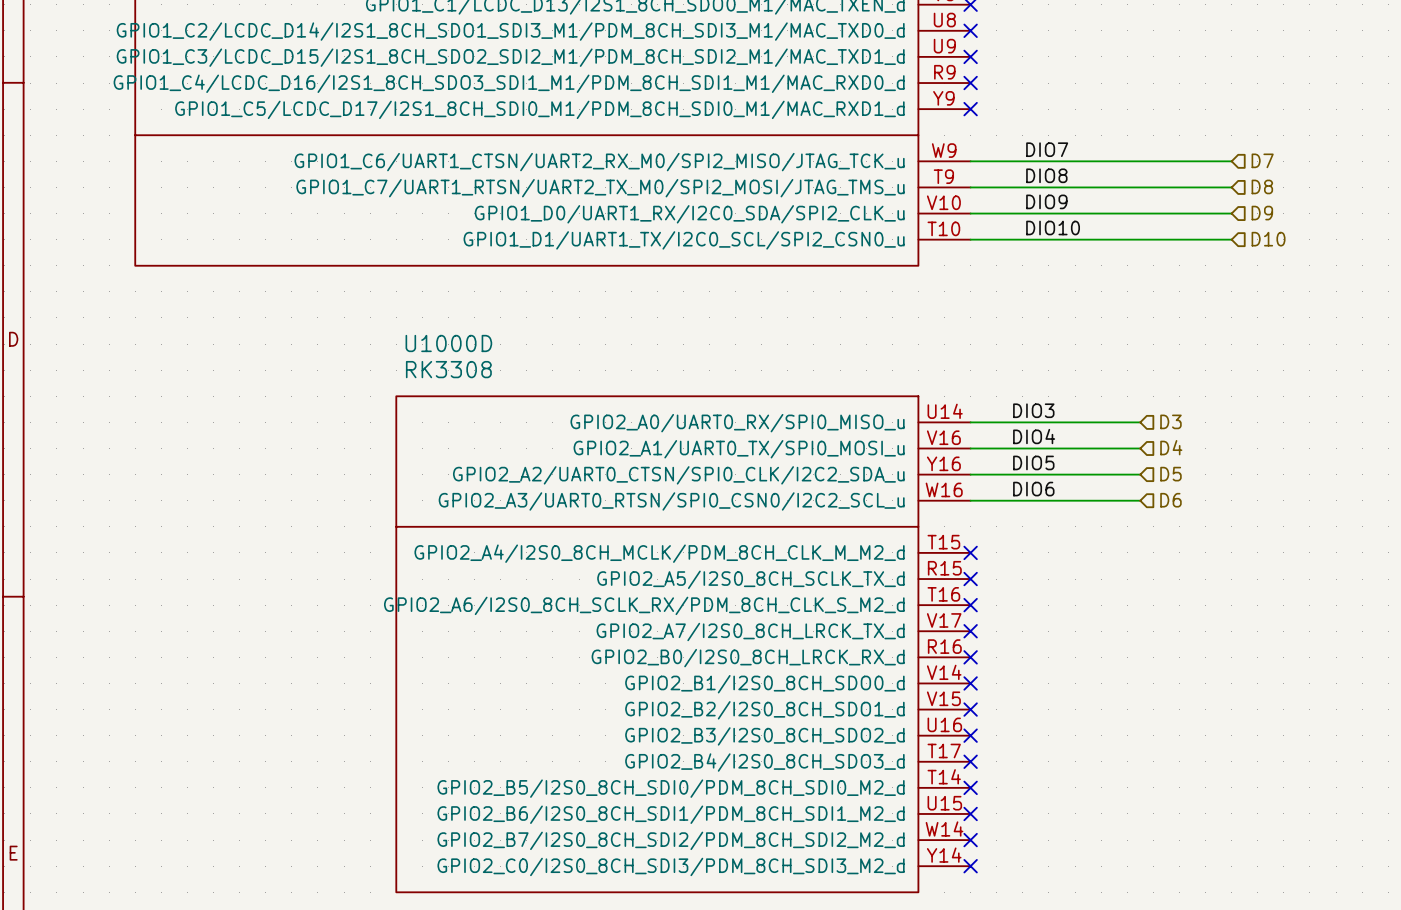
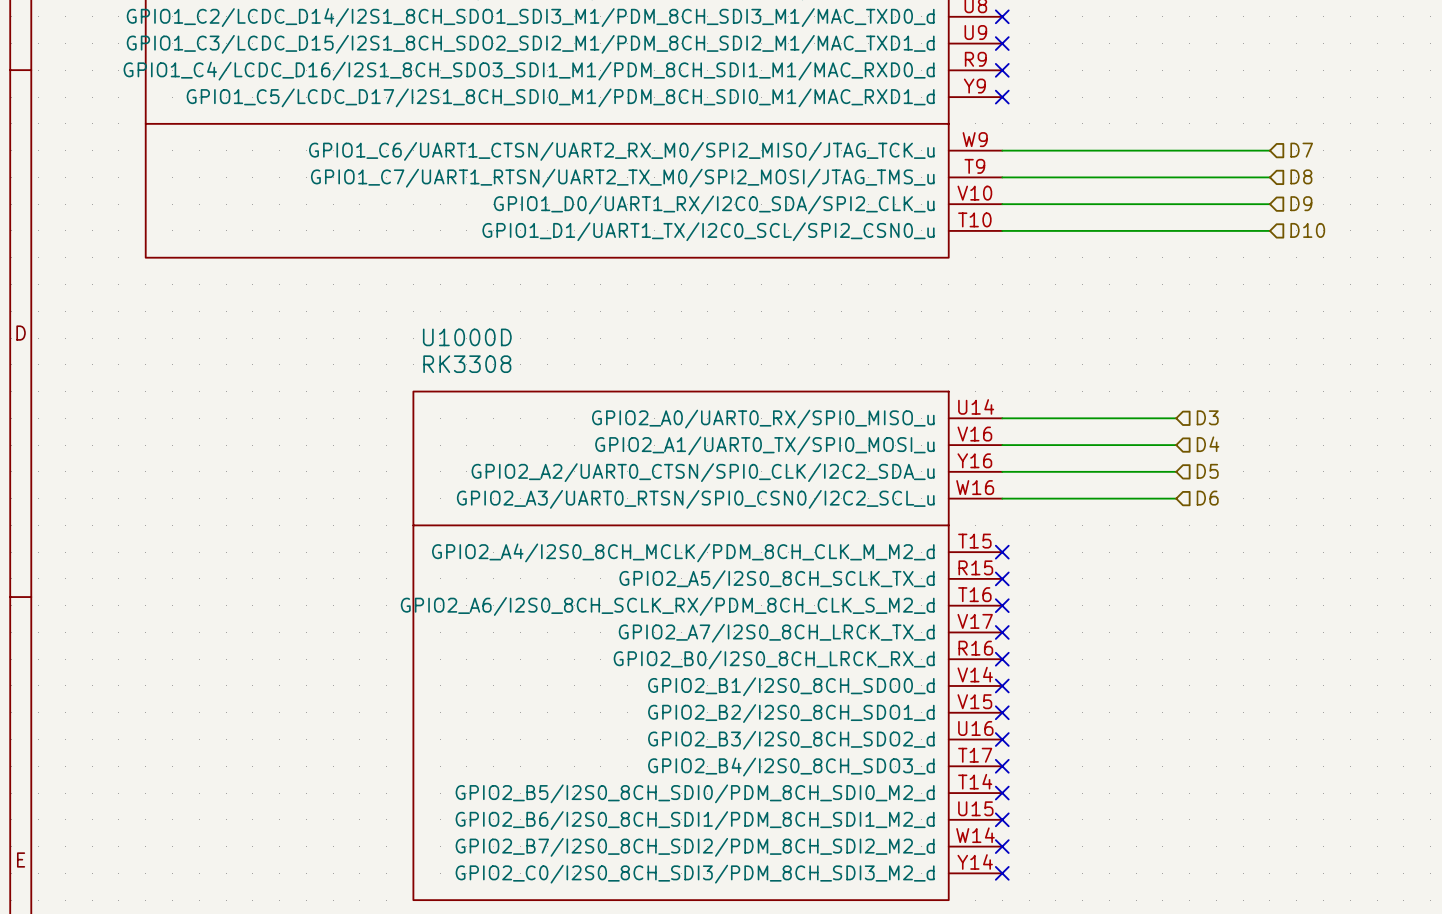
label: DIO7 (1047, 149) -> none
label: DIO8 (1046, 175) -> none
label: DIO9 (1046, 201) -> none
label: DIO10 (1053, 228) -> none
label: DIO3 (1033, 410) -> none
label: DIO4 (1034, 436) -> none
label: DIO5 (1033, 462) -> none
label: DIO6 (1033, 489) -> none

